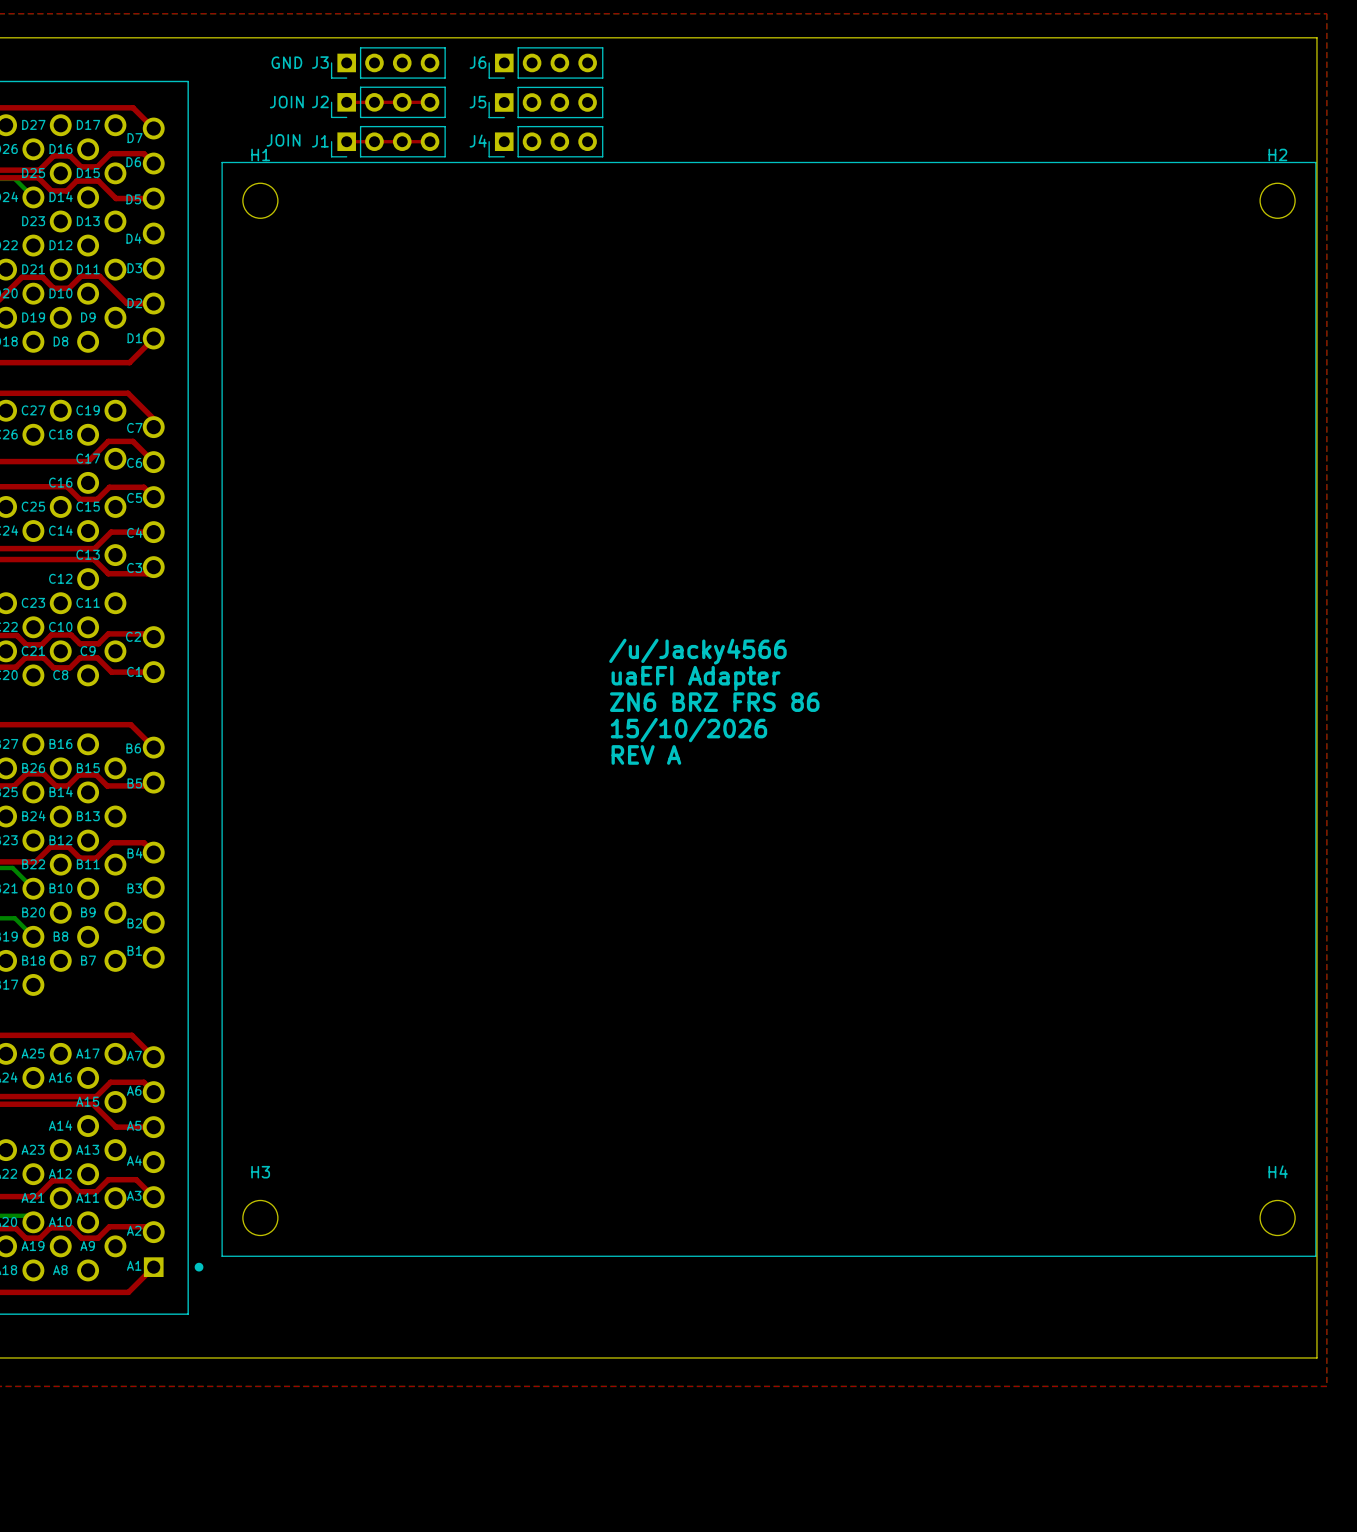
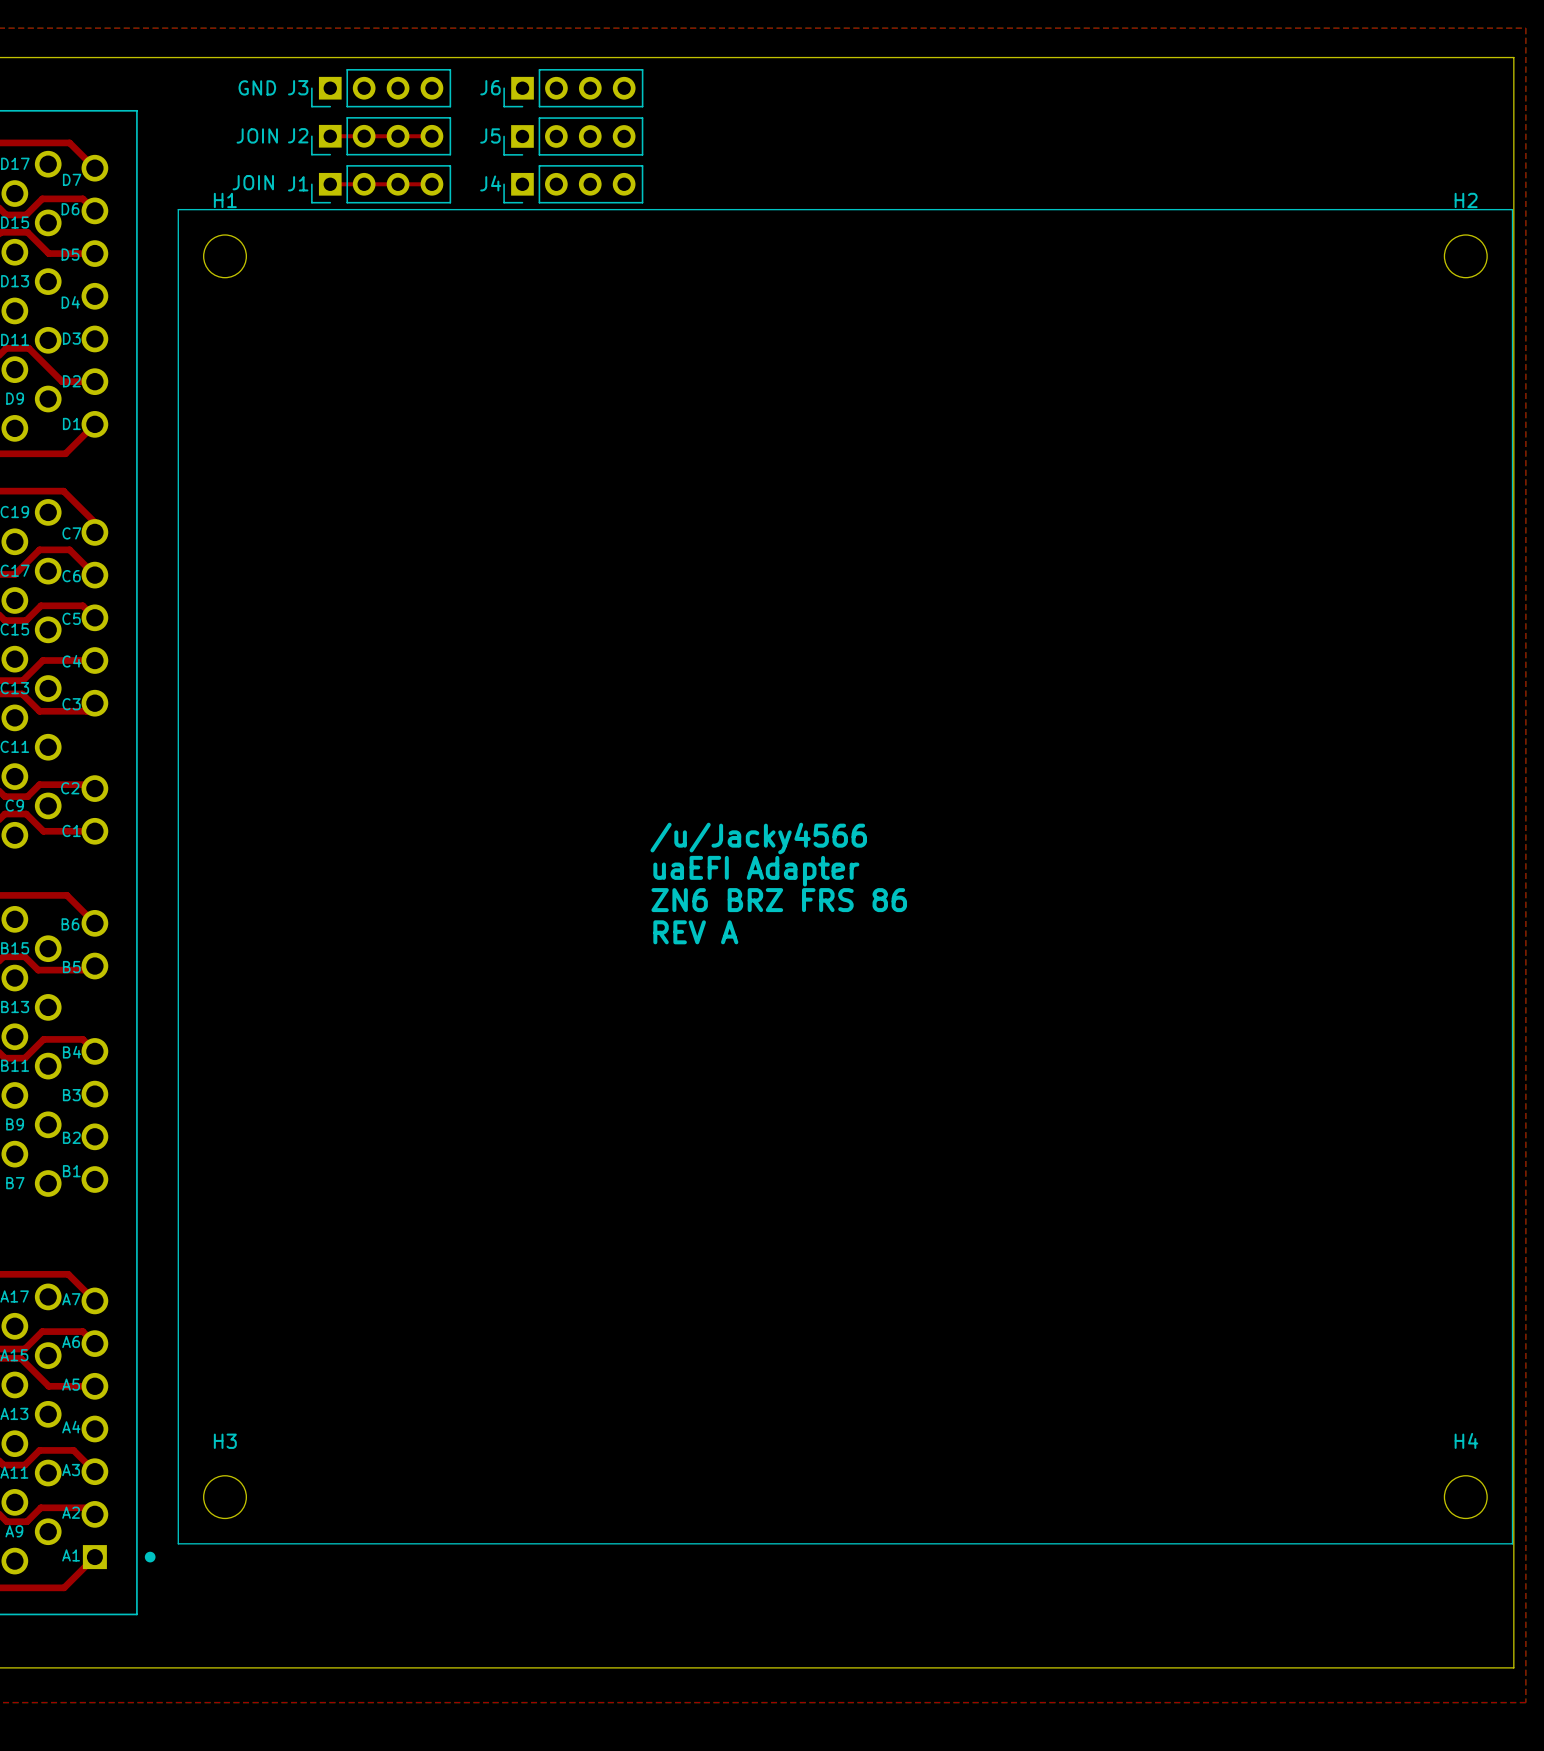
text: /u/Jacky4566 (697, 651) -> none
text: uaEFI Adapter (696, 678) -> /u/Jacky4566 (758, 838)
text: ZN6 BRZ FRS 86 (714, 702) -> uaEFI Adapter (756, 871)
text: 15/10/2026 (688, 730) -> ZN6 BRZ FRS 86 (779, 900)

